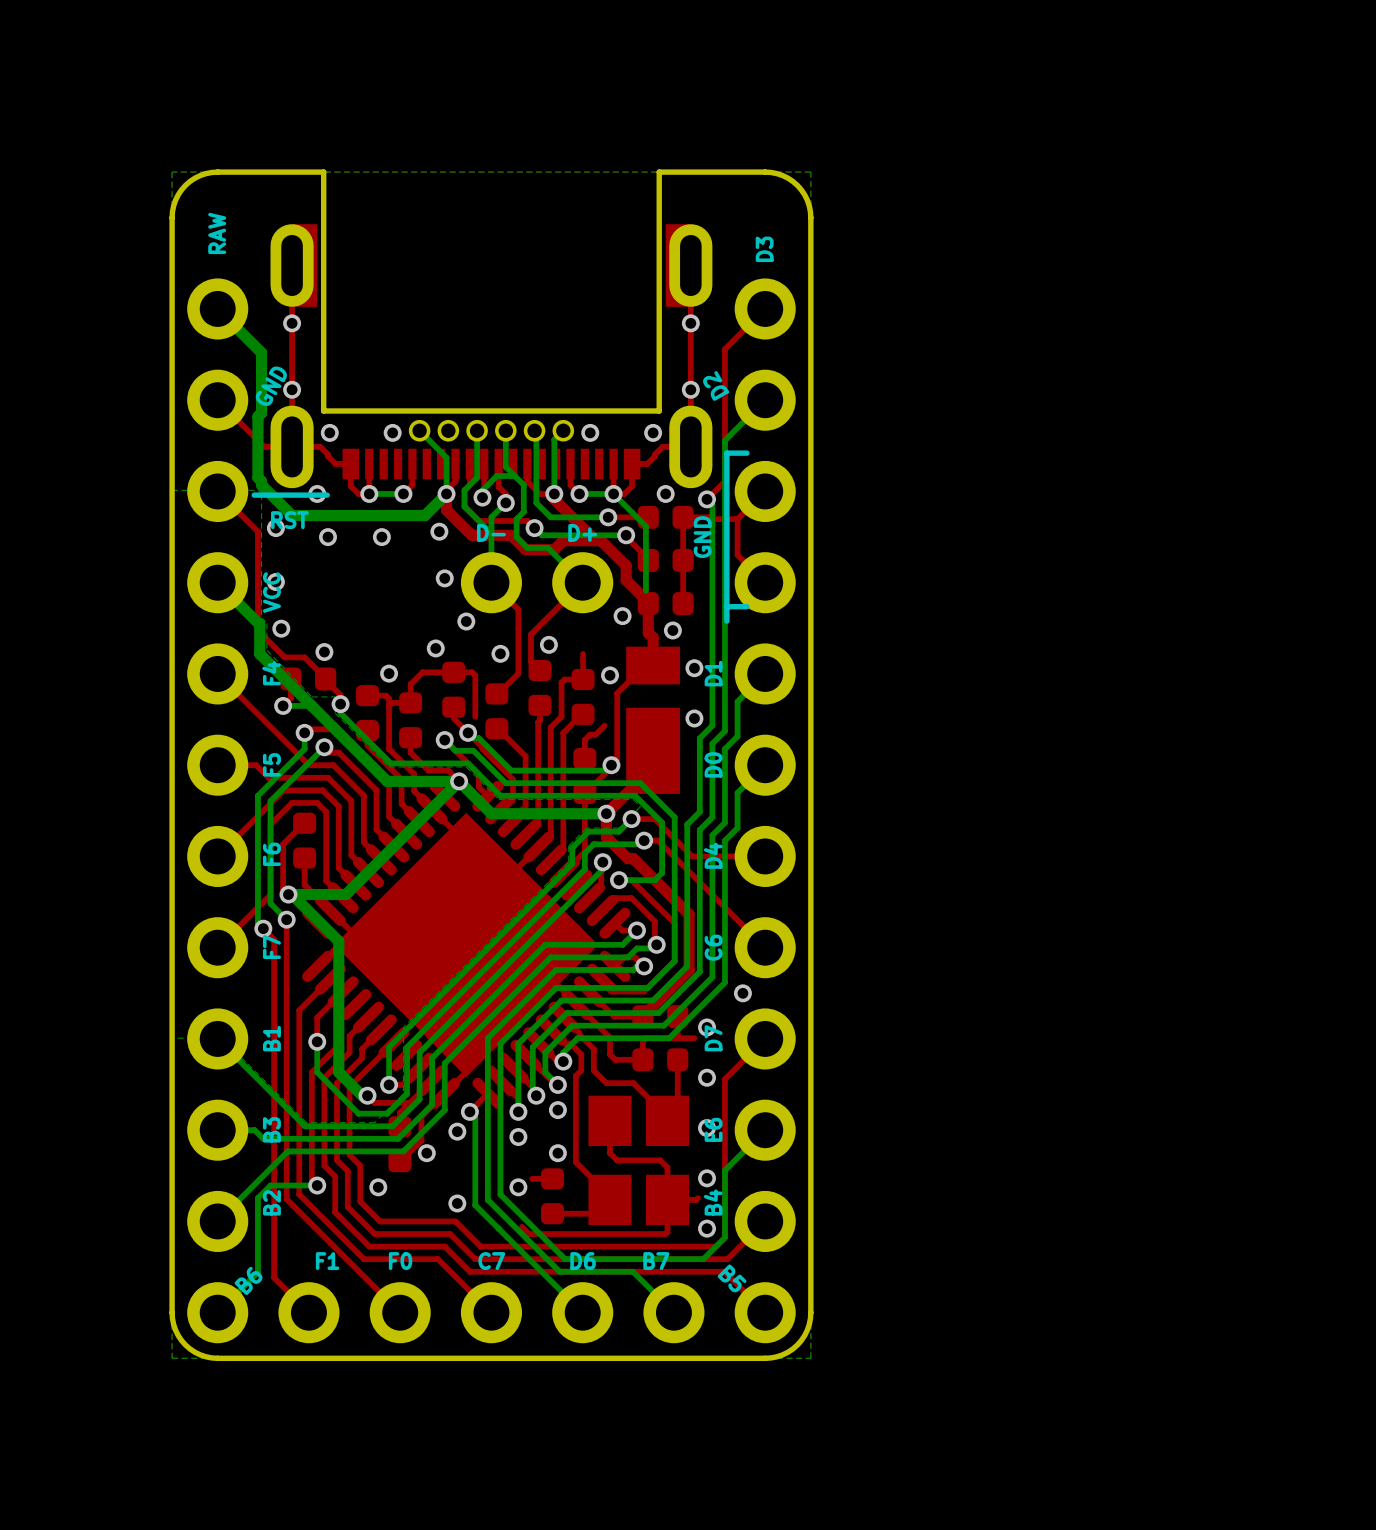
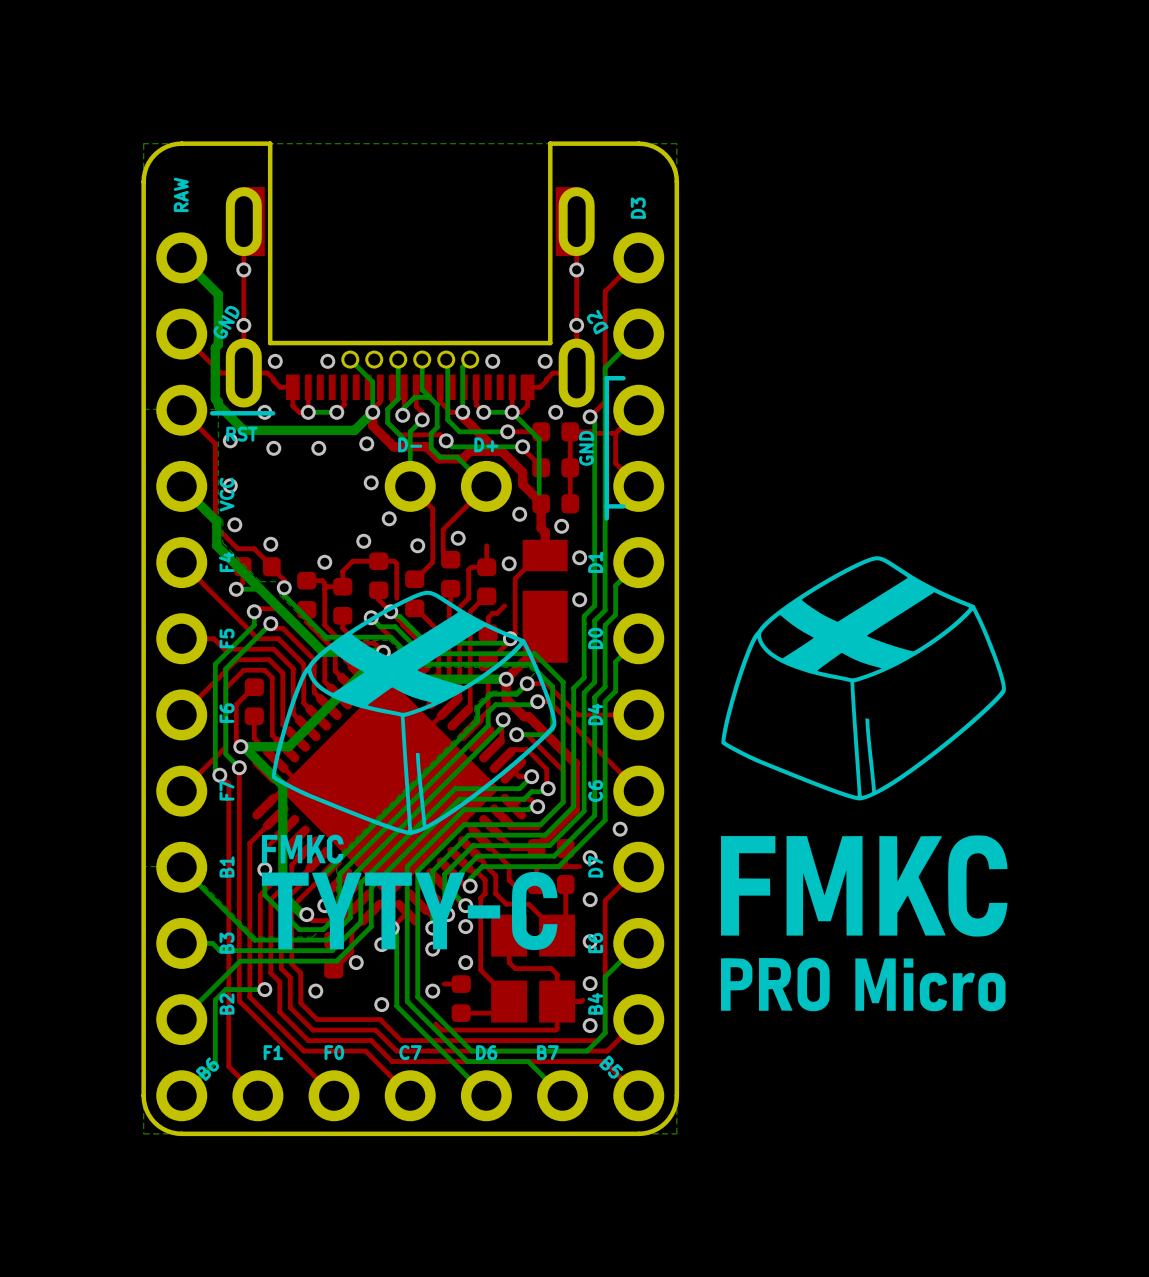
drawing: none -> [721, 556, 1008, 1012]
drawing: none -> [261, 590, 558, 951]

